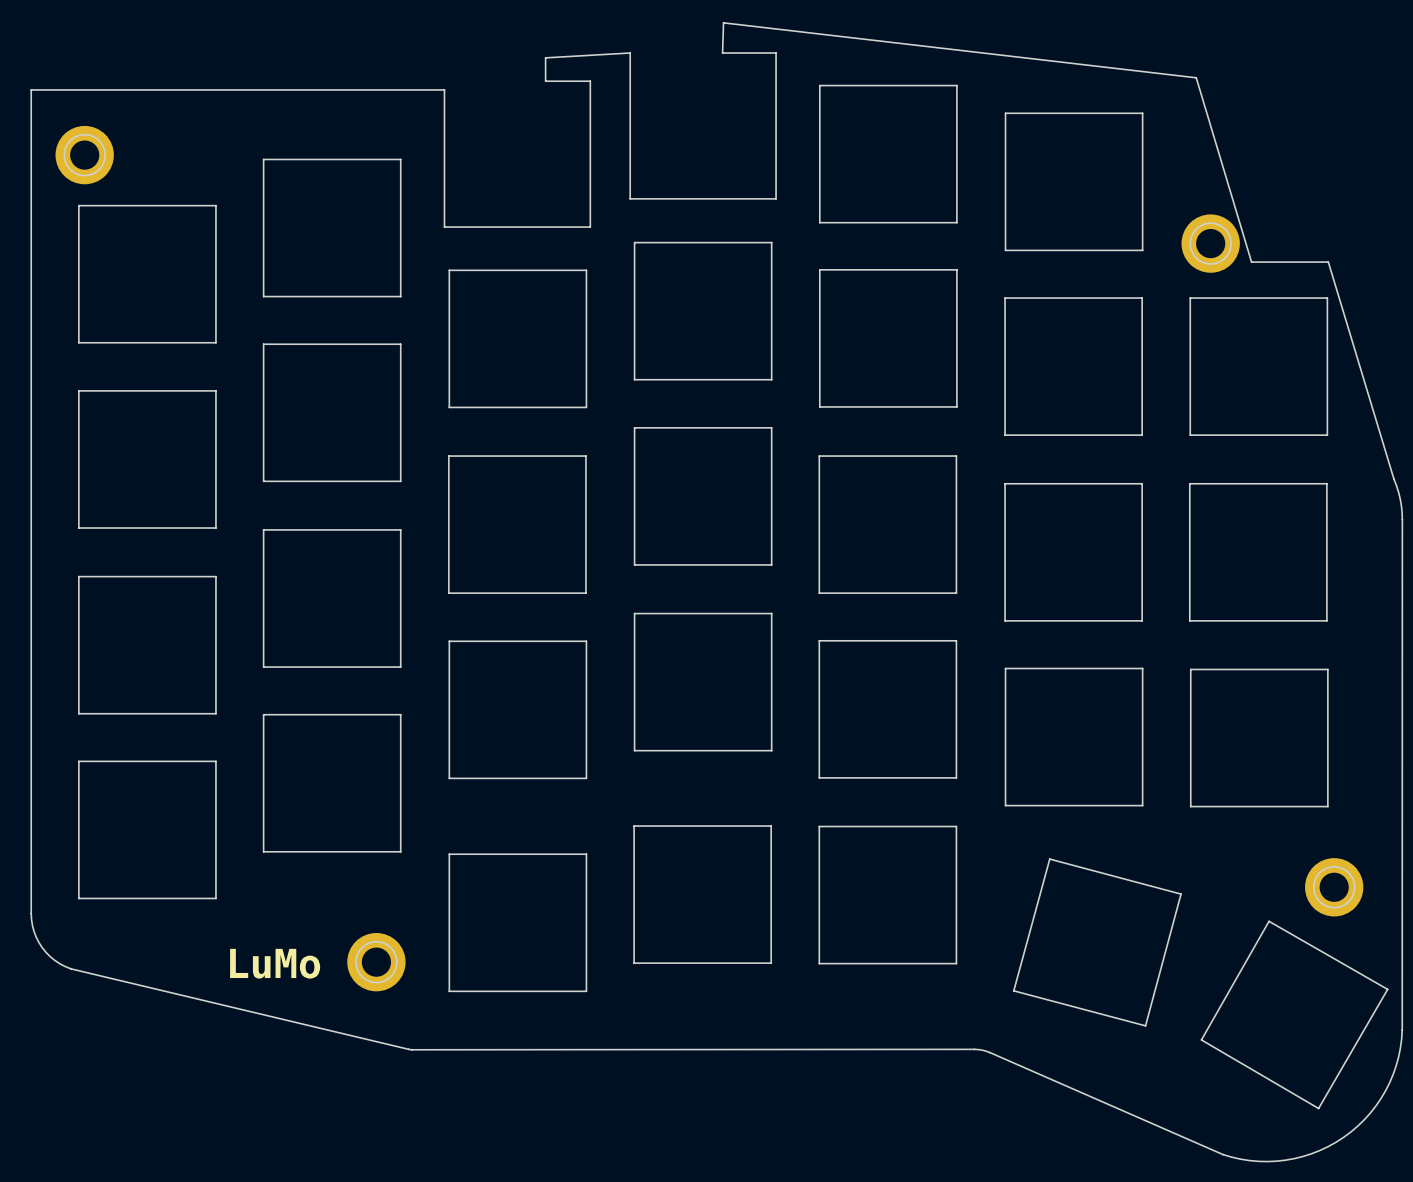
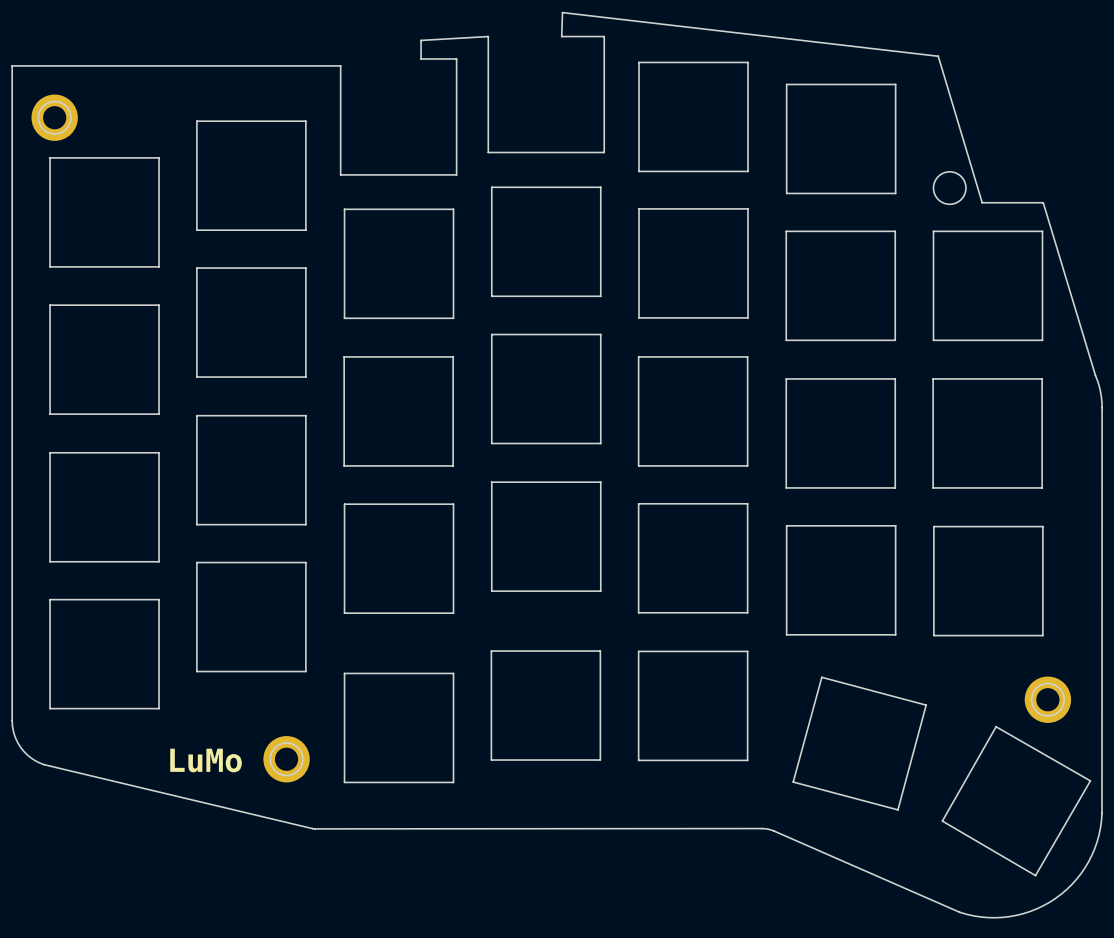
part: (1210, 243) -> none

